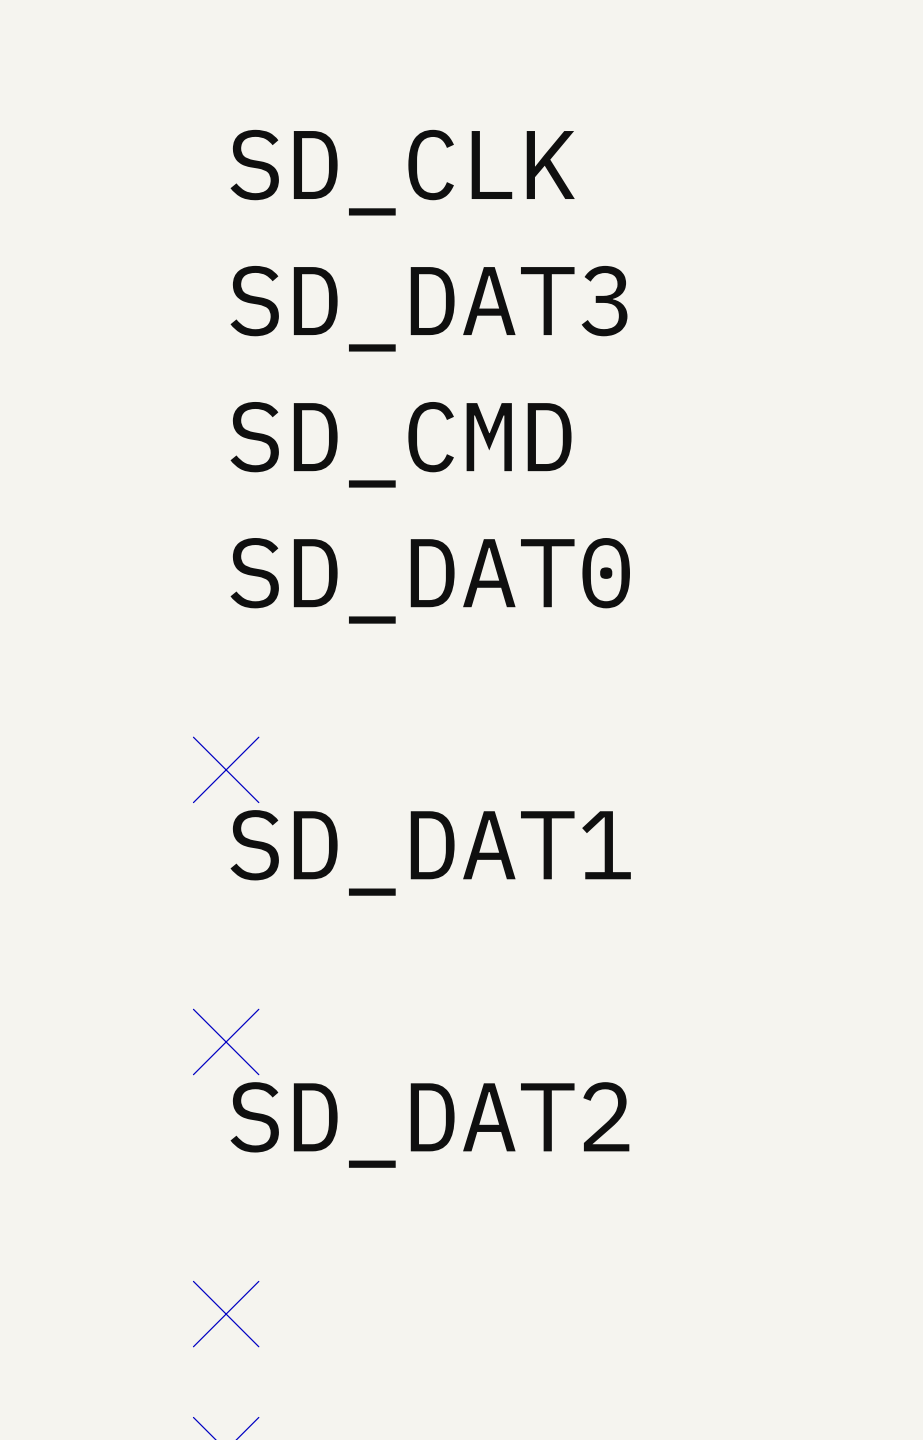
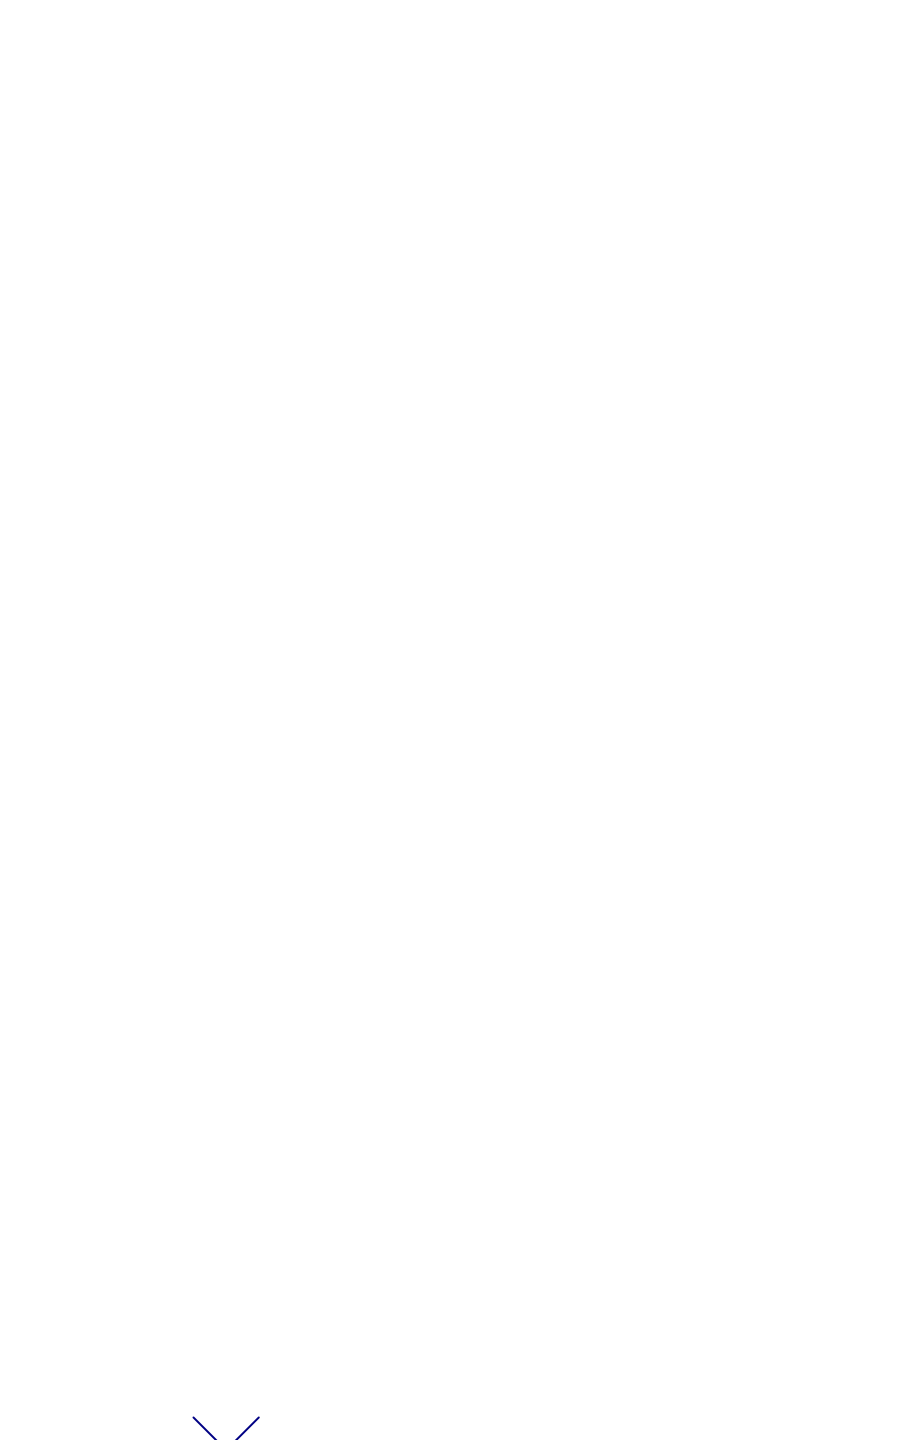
label: SD_CLK (402, 172) -> none
label: SD_DAT3 (428, 308) -> none
label: SD_CMD (401, 444) -> none
label: SD_DAT0 (430, 580) -> none
no-connect mark: (226, 769) -> none
label: SD_DAT1 (430, 852) -> none
no-connect mark: (226, 1041) -> none
label: SD_DAT2 (429, 1124) -> none
no-connect mark: (226, 1314) -> none

